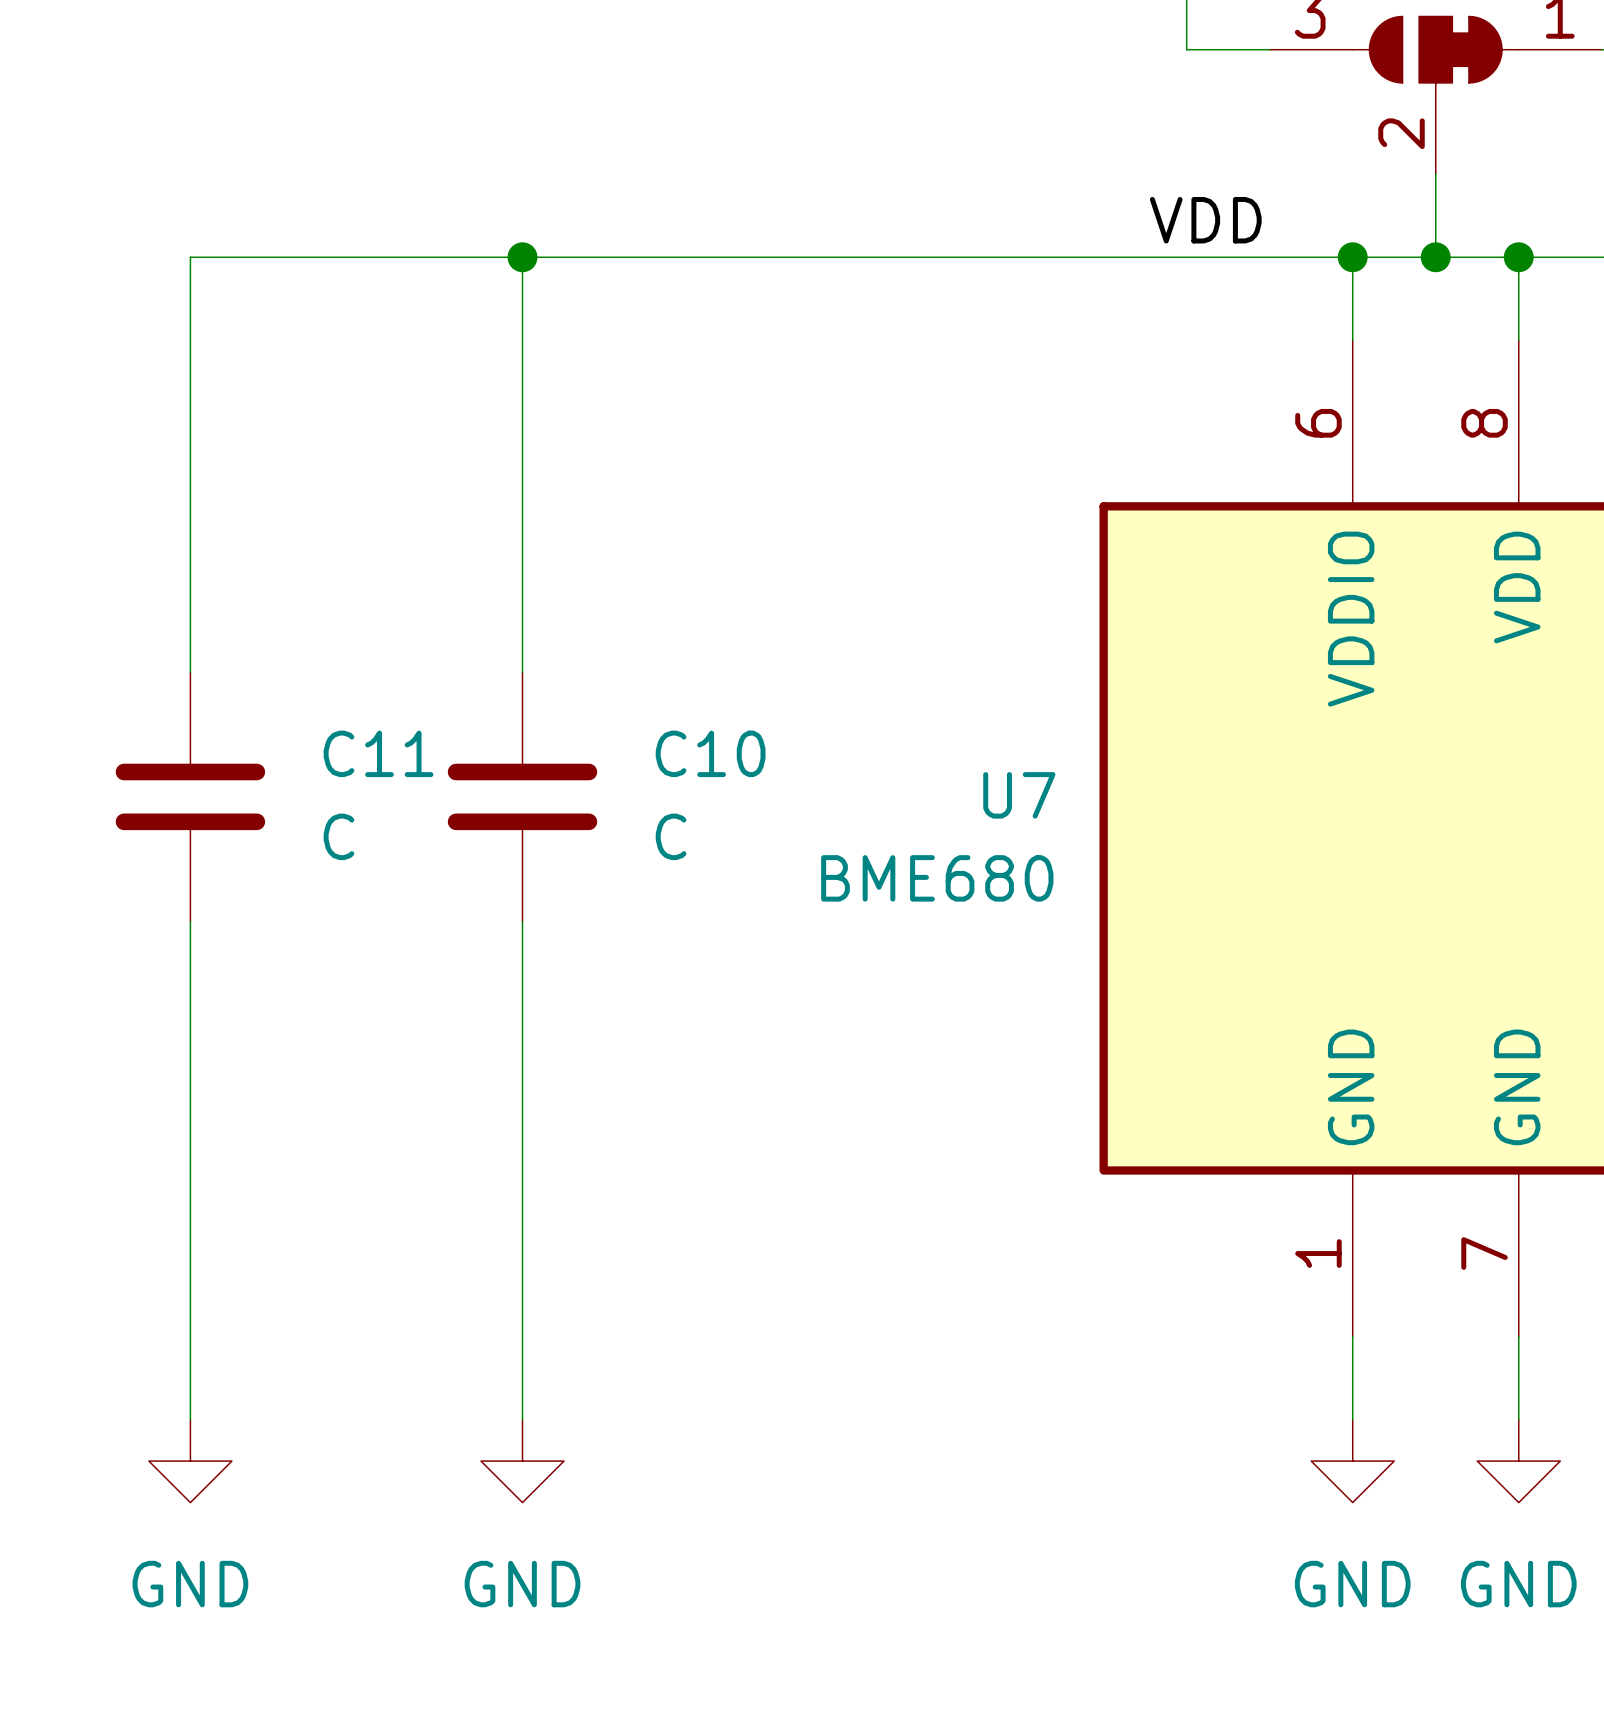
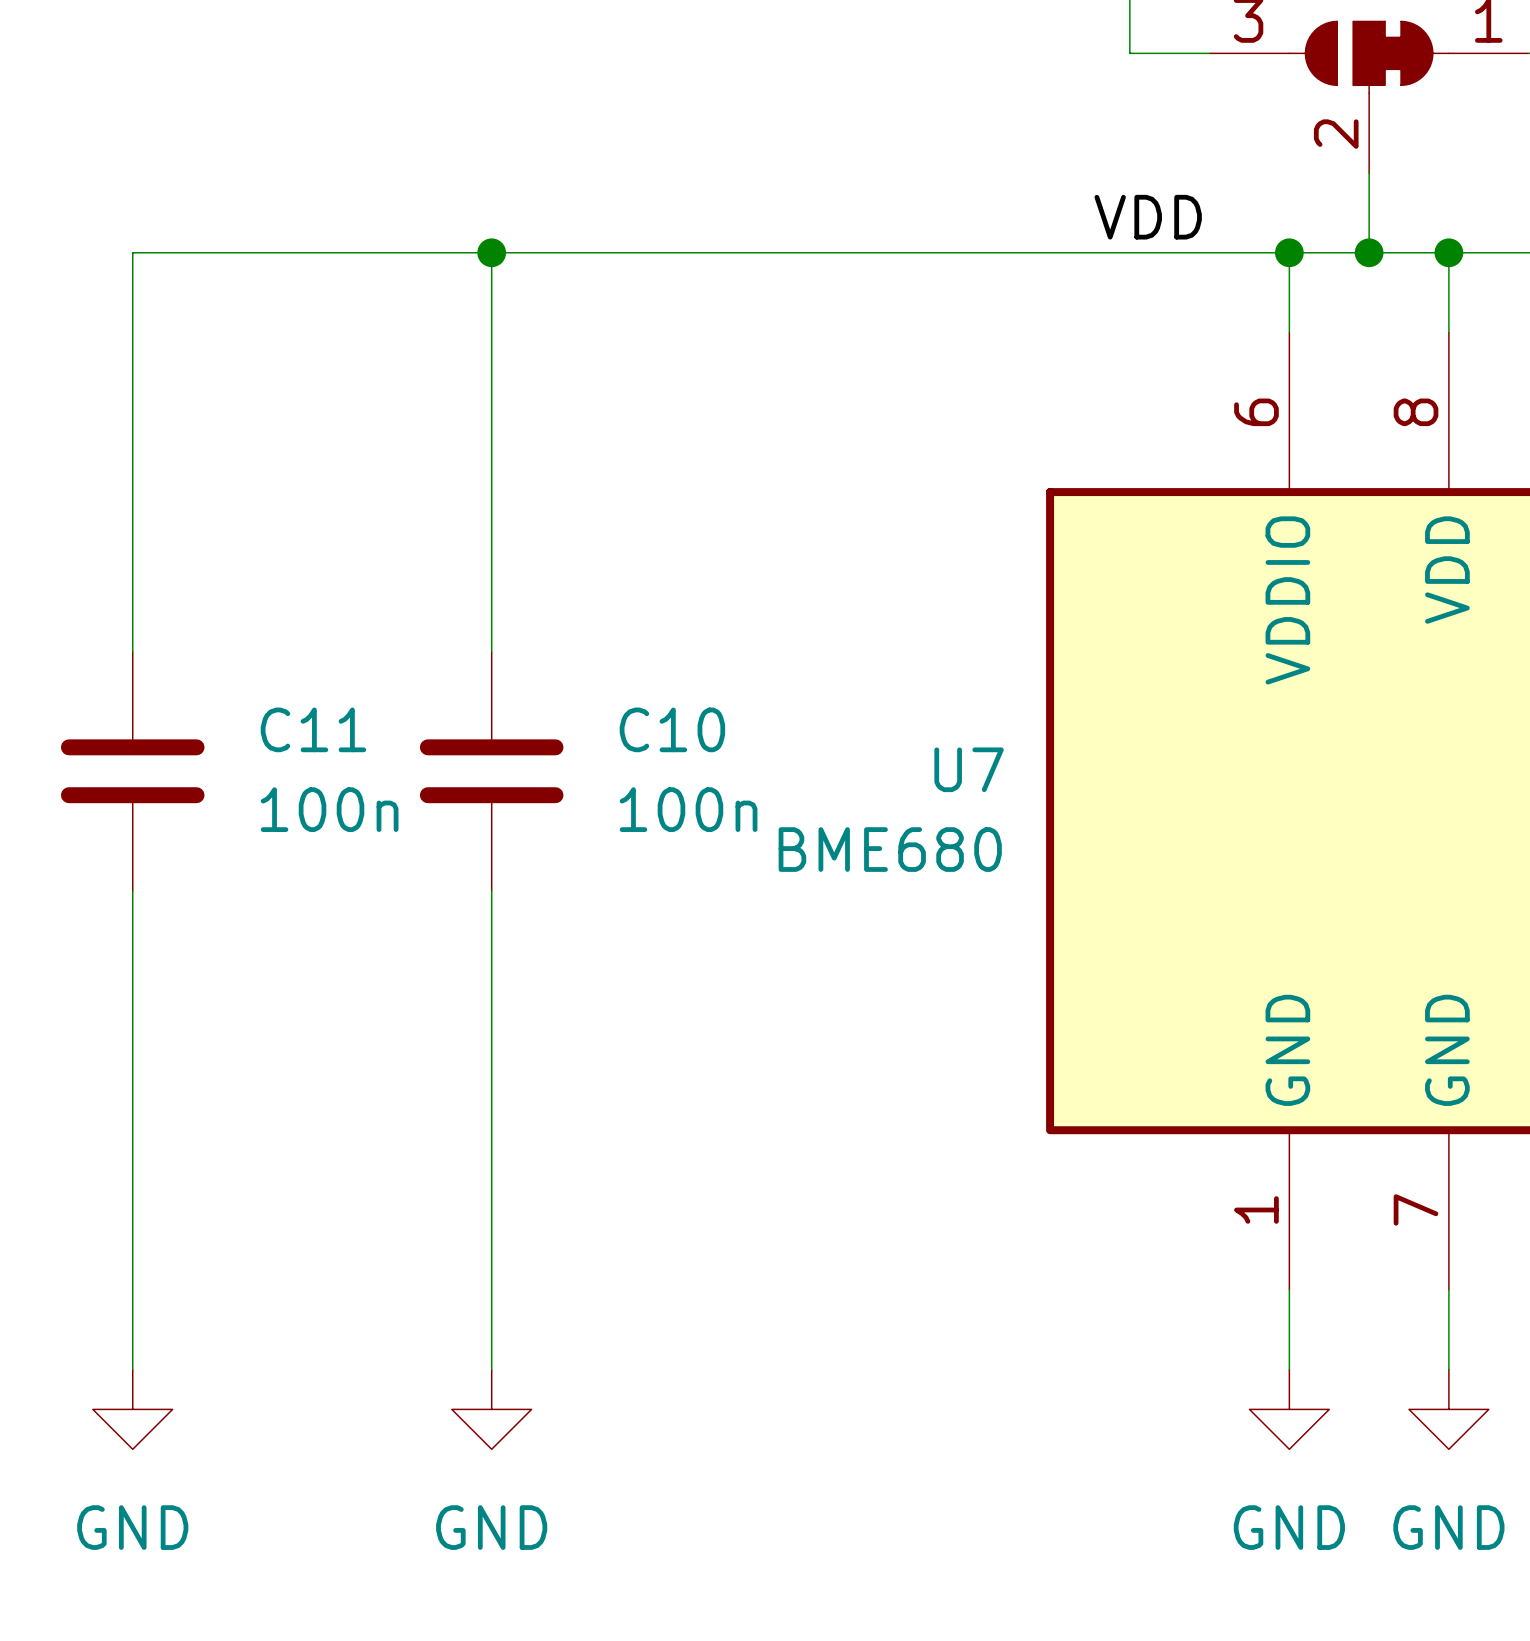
wire: (190, 257) (190, 672) -> (172, 252) (132, 252) (132, 651)
C11 position: (190, 796) -> (132, 771)
C11 value: C (338, 836) -> 100n (329, 809)
C10 value: C (671, 836) -> 100n (688, 809)
wire: (190, 921) (190, 1419) -> (132, 890) (132, 1369)
power symbol position: GND (190, 1461) -> GND (132, 1409)

